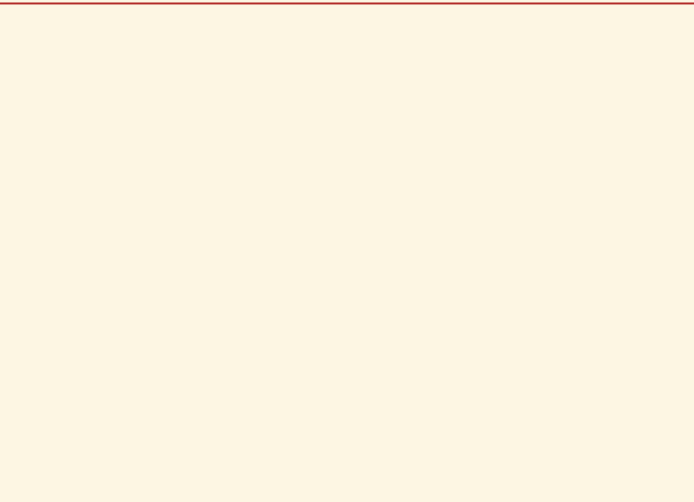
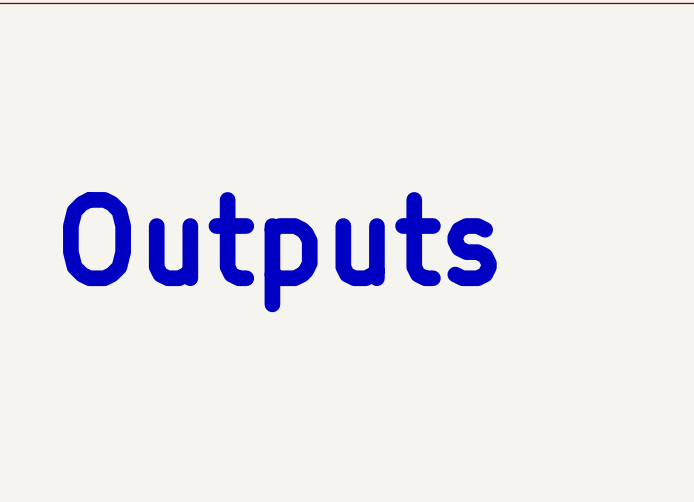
text: none -> Outputs (279, 252)

